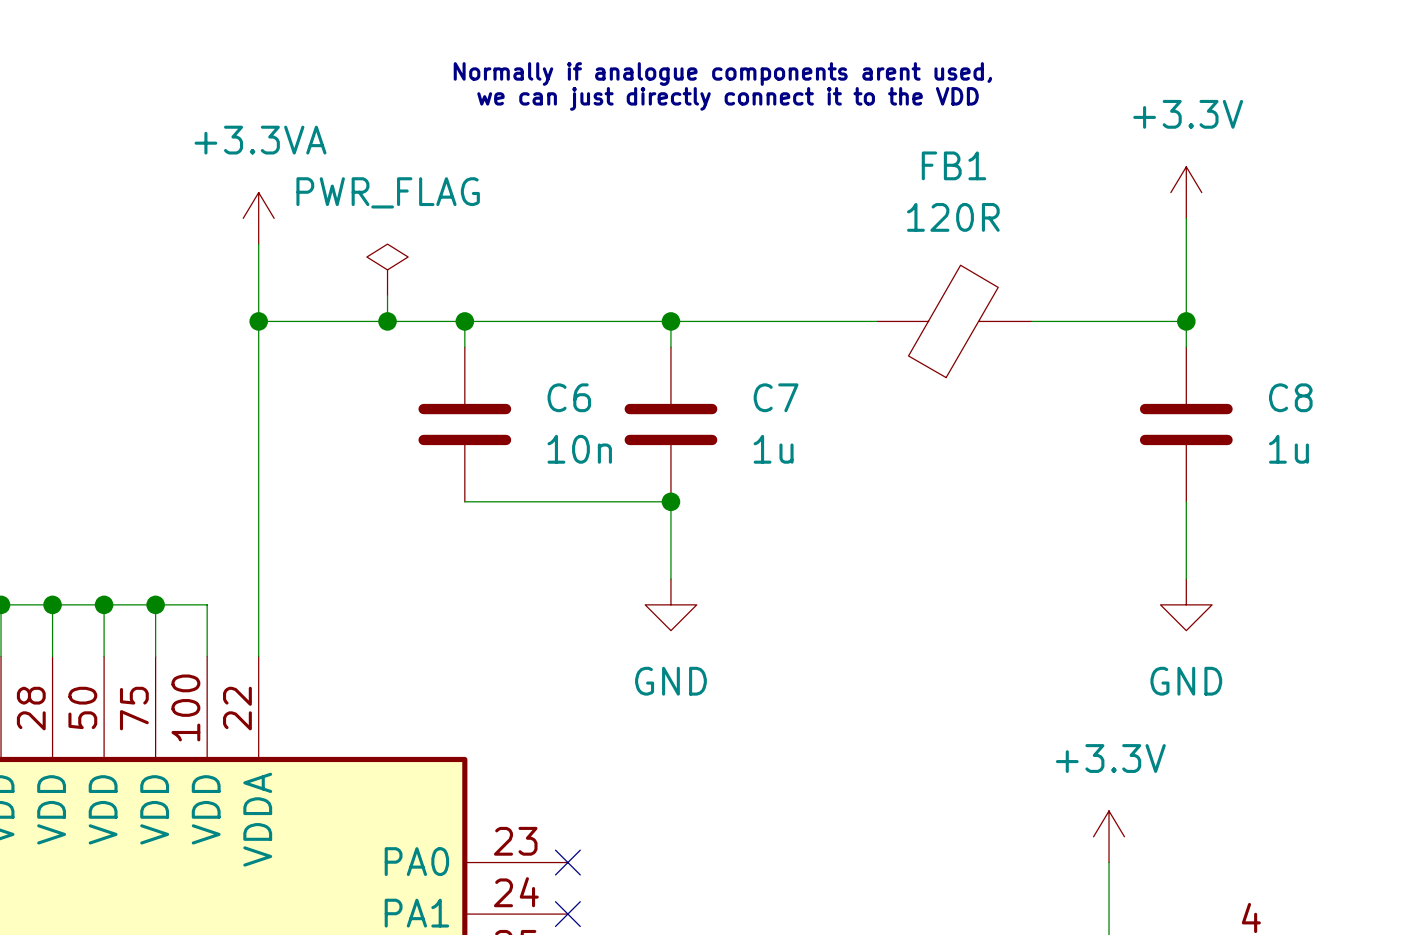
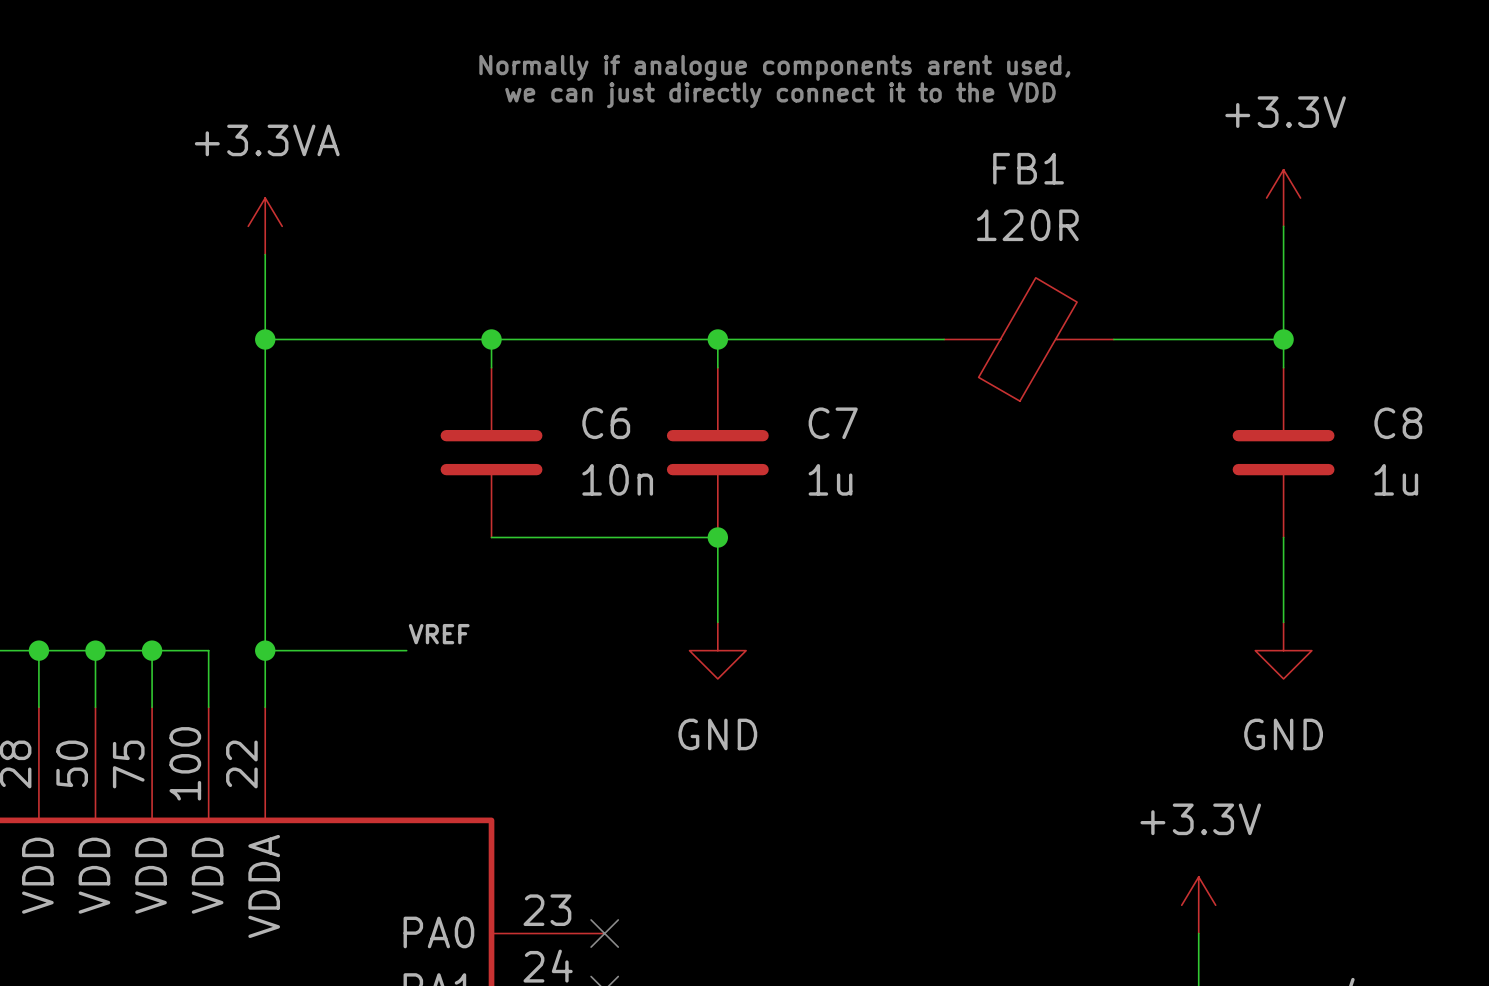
power symbol: PWR_FLAG (387, 269) -> none
wire: (387, 295) (387, 321) -> none
junction: (387, 321) -> none
label: none -> VREF (439, 634)
wire: none -> (265, 650) (406, 650)
junction: none -> (265, 650)

